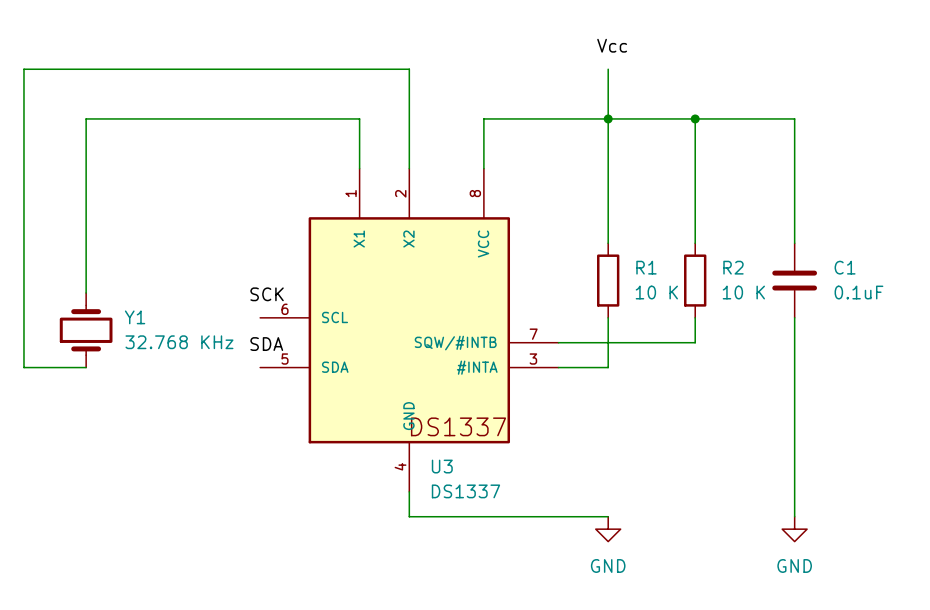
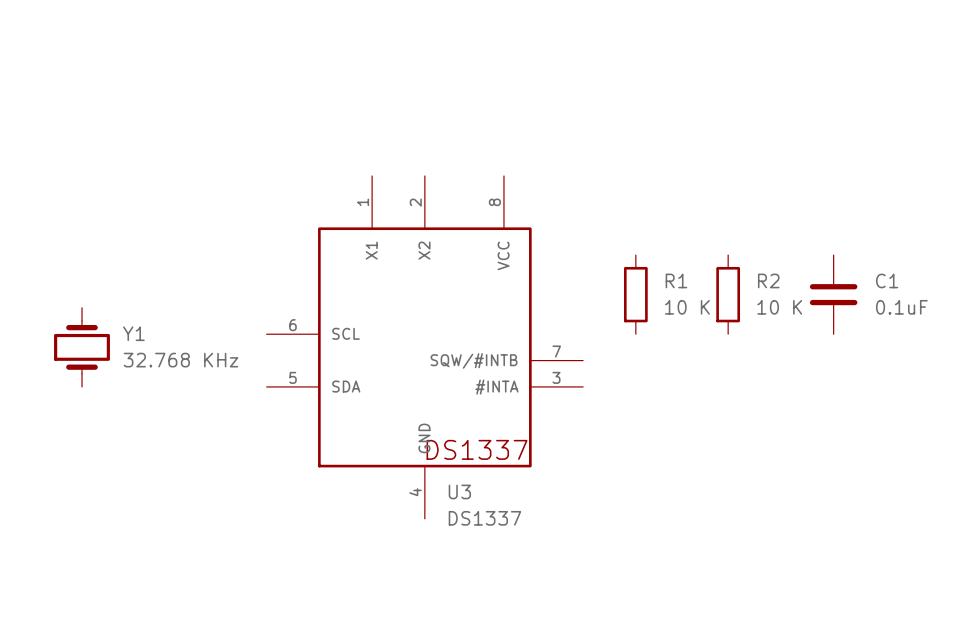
label: Vcc (612, 45) -> none
wire: (608, 69) (608, 243) -> none
junction: (608, 118) -> none
wire: (695, 118) (695, 243) -> none
junction: (695, 118) -> none
wire: (359, 168) (359, 118) (86, 118) (86, 292) -> none
wire: (409, 168) (409, 69) (23, 69) (23, 367) (86, 367) -> none
wire: (483, 168) (483, 118) (794, 118) (794, 243) -> none
label: SCK (267, 294) -> none
wire: (608, 317) (608, 367) (558, 367) -> none
wire: (695, 317) (695, 342) (558, 342) -> none
wire: (794, 317) (794, 516) -> none
label: SDA (266, 344) -> none
wire: (409, 491) (409, 516) (608, 516) -> none
power symbol: GND (608, 529) -> none
power symbol: GND (794, 529) -> none

